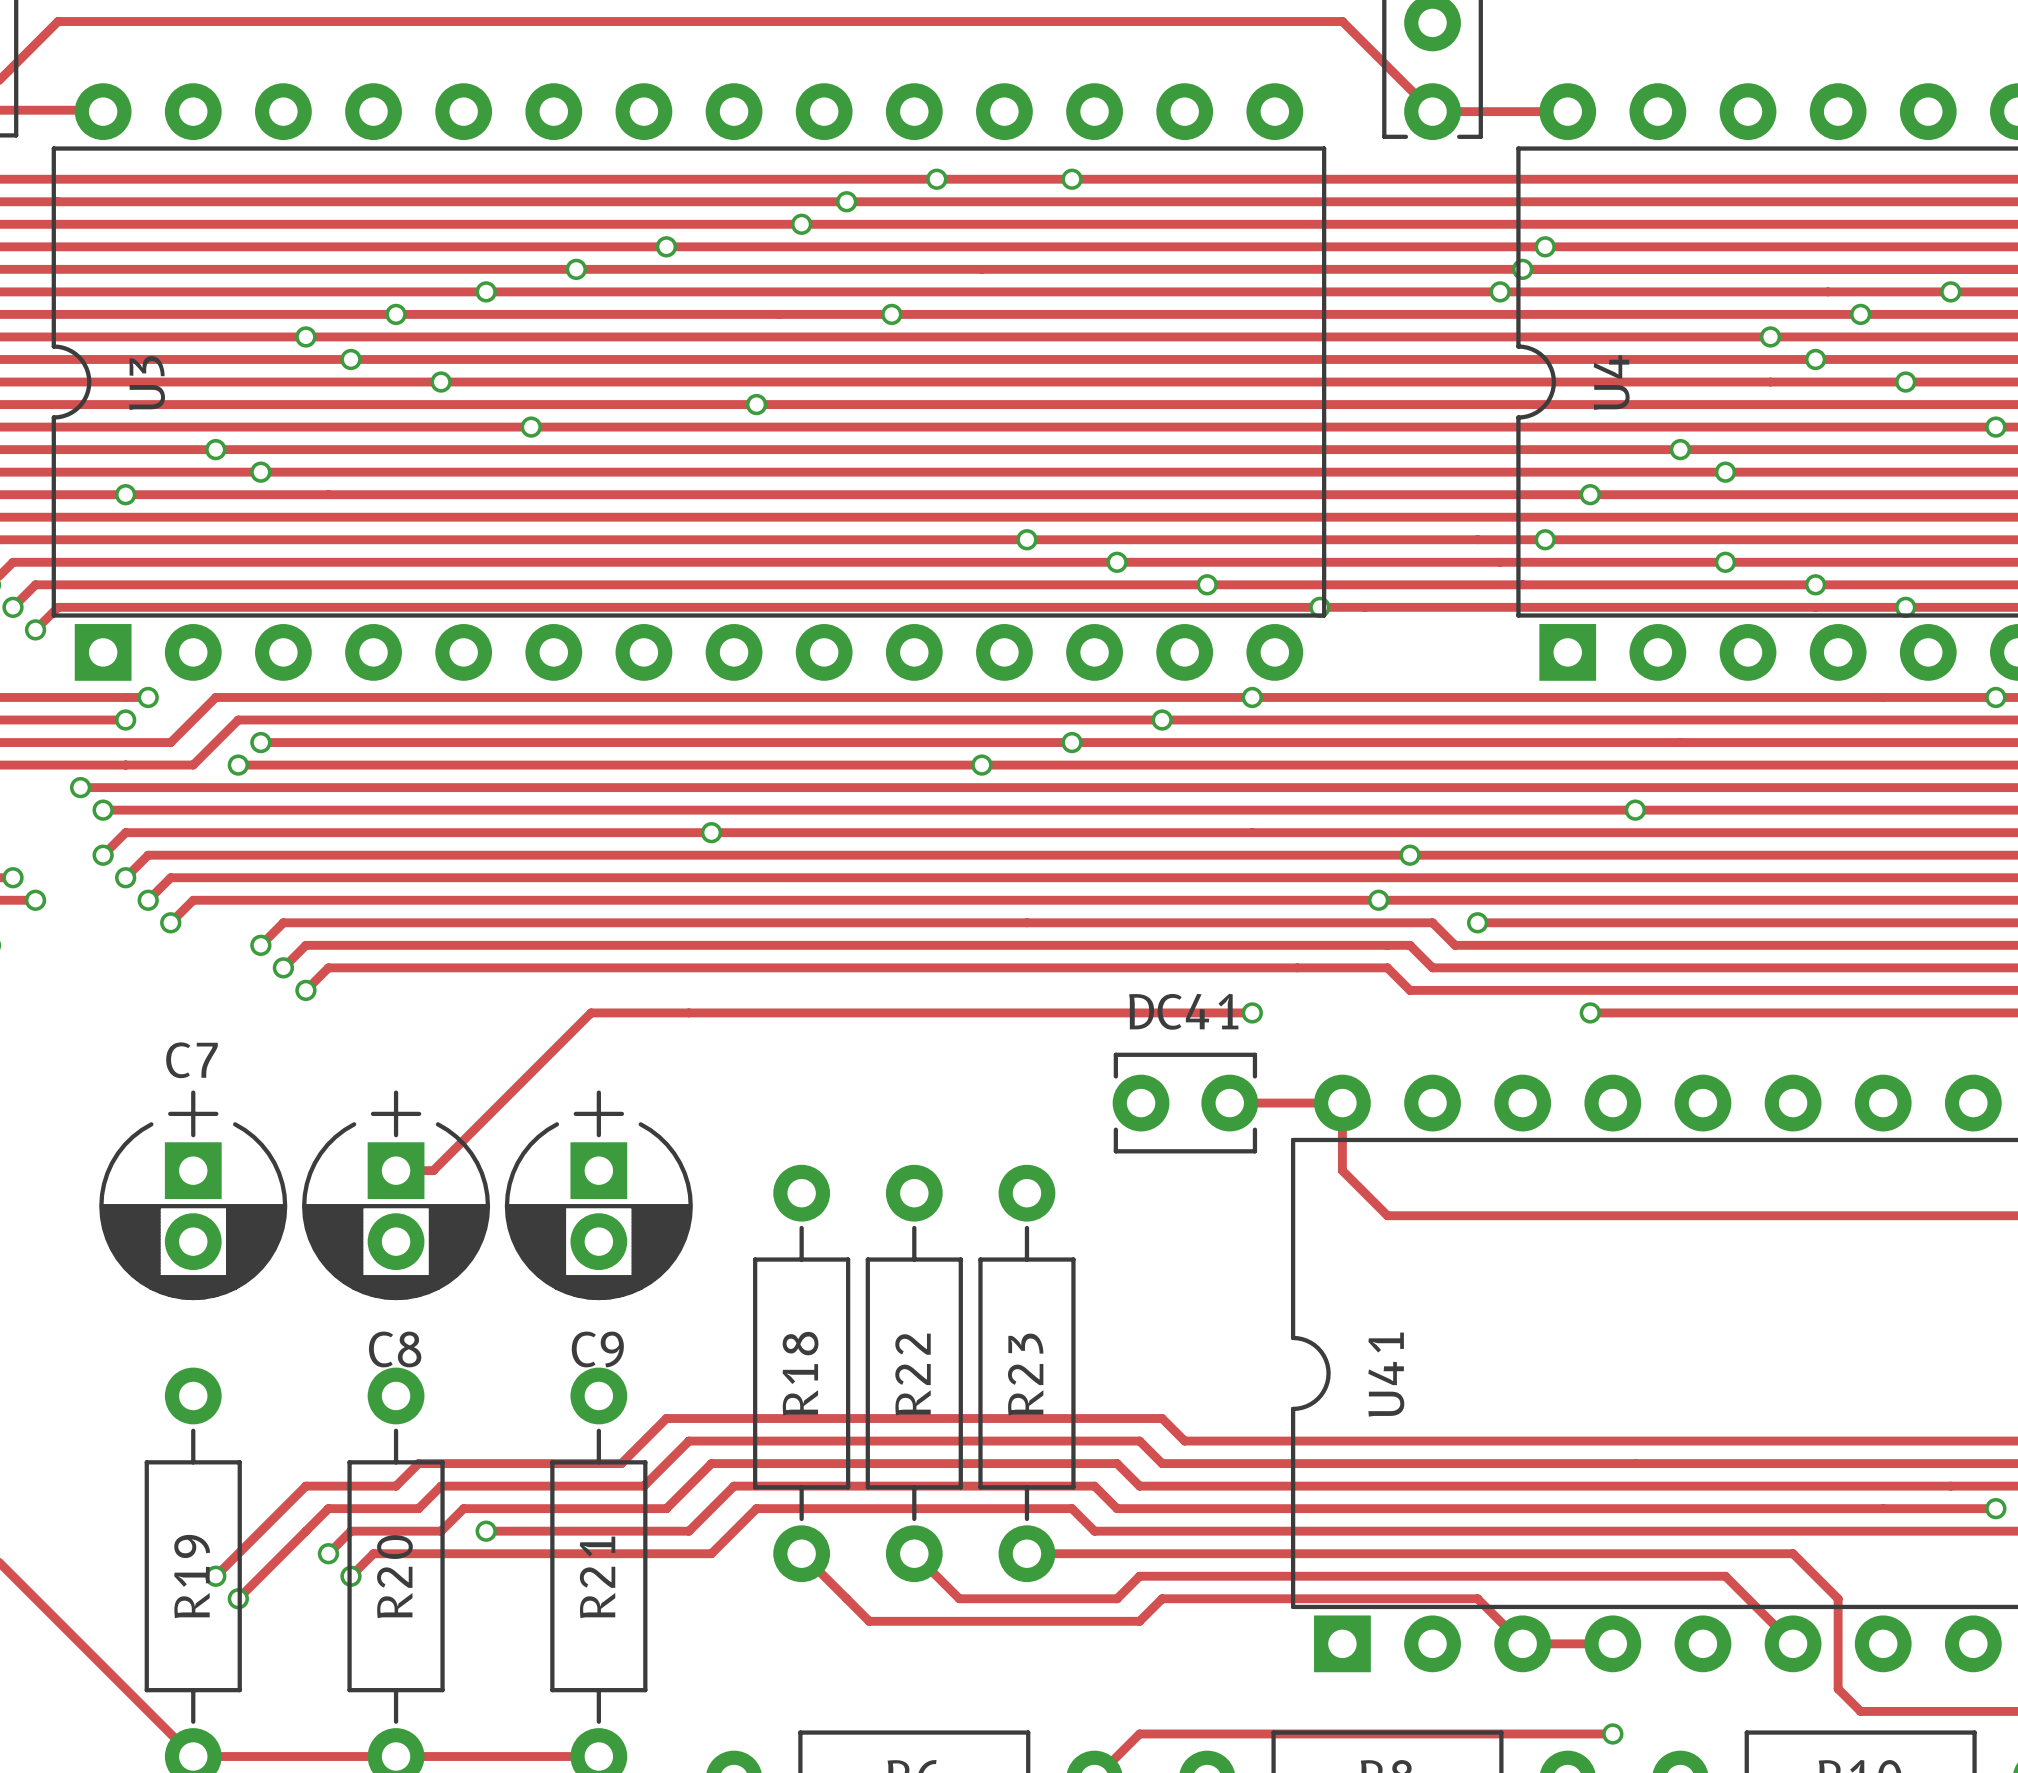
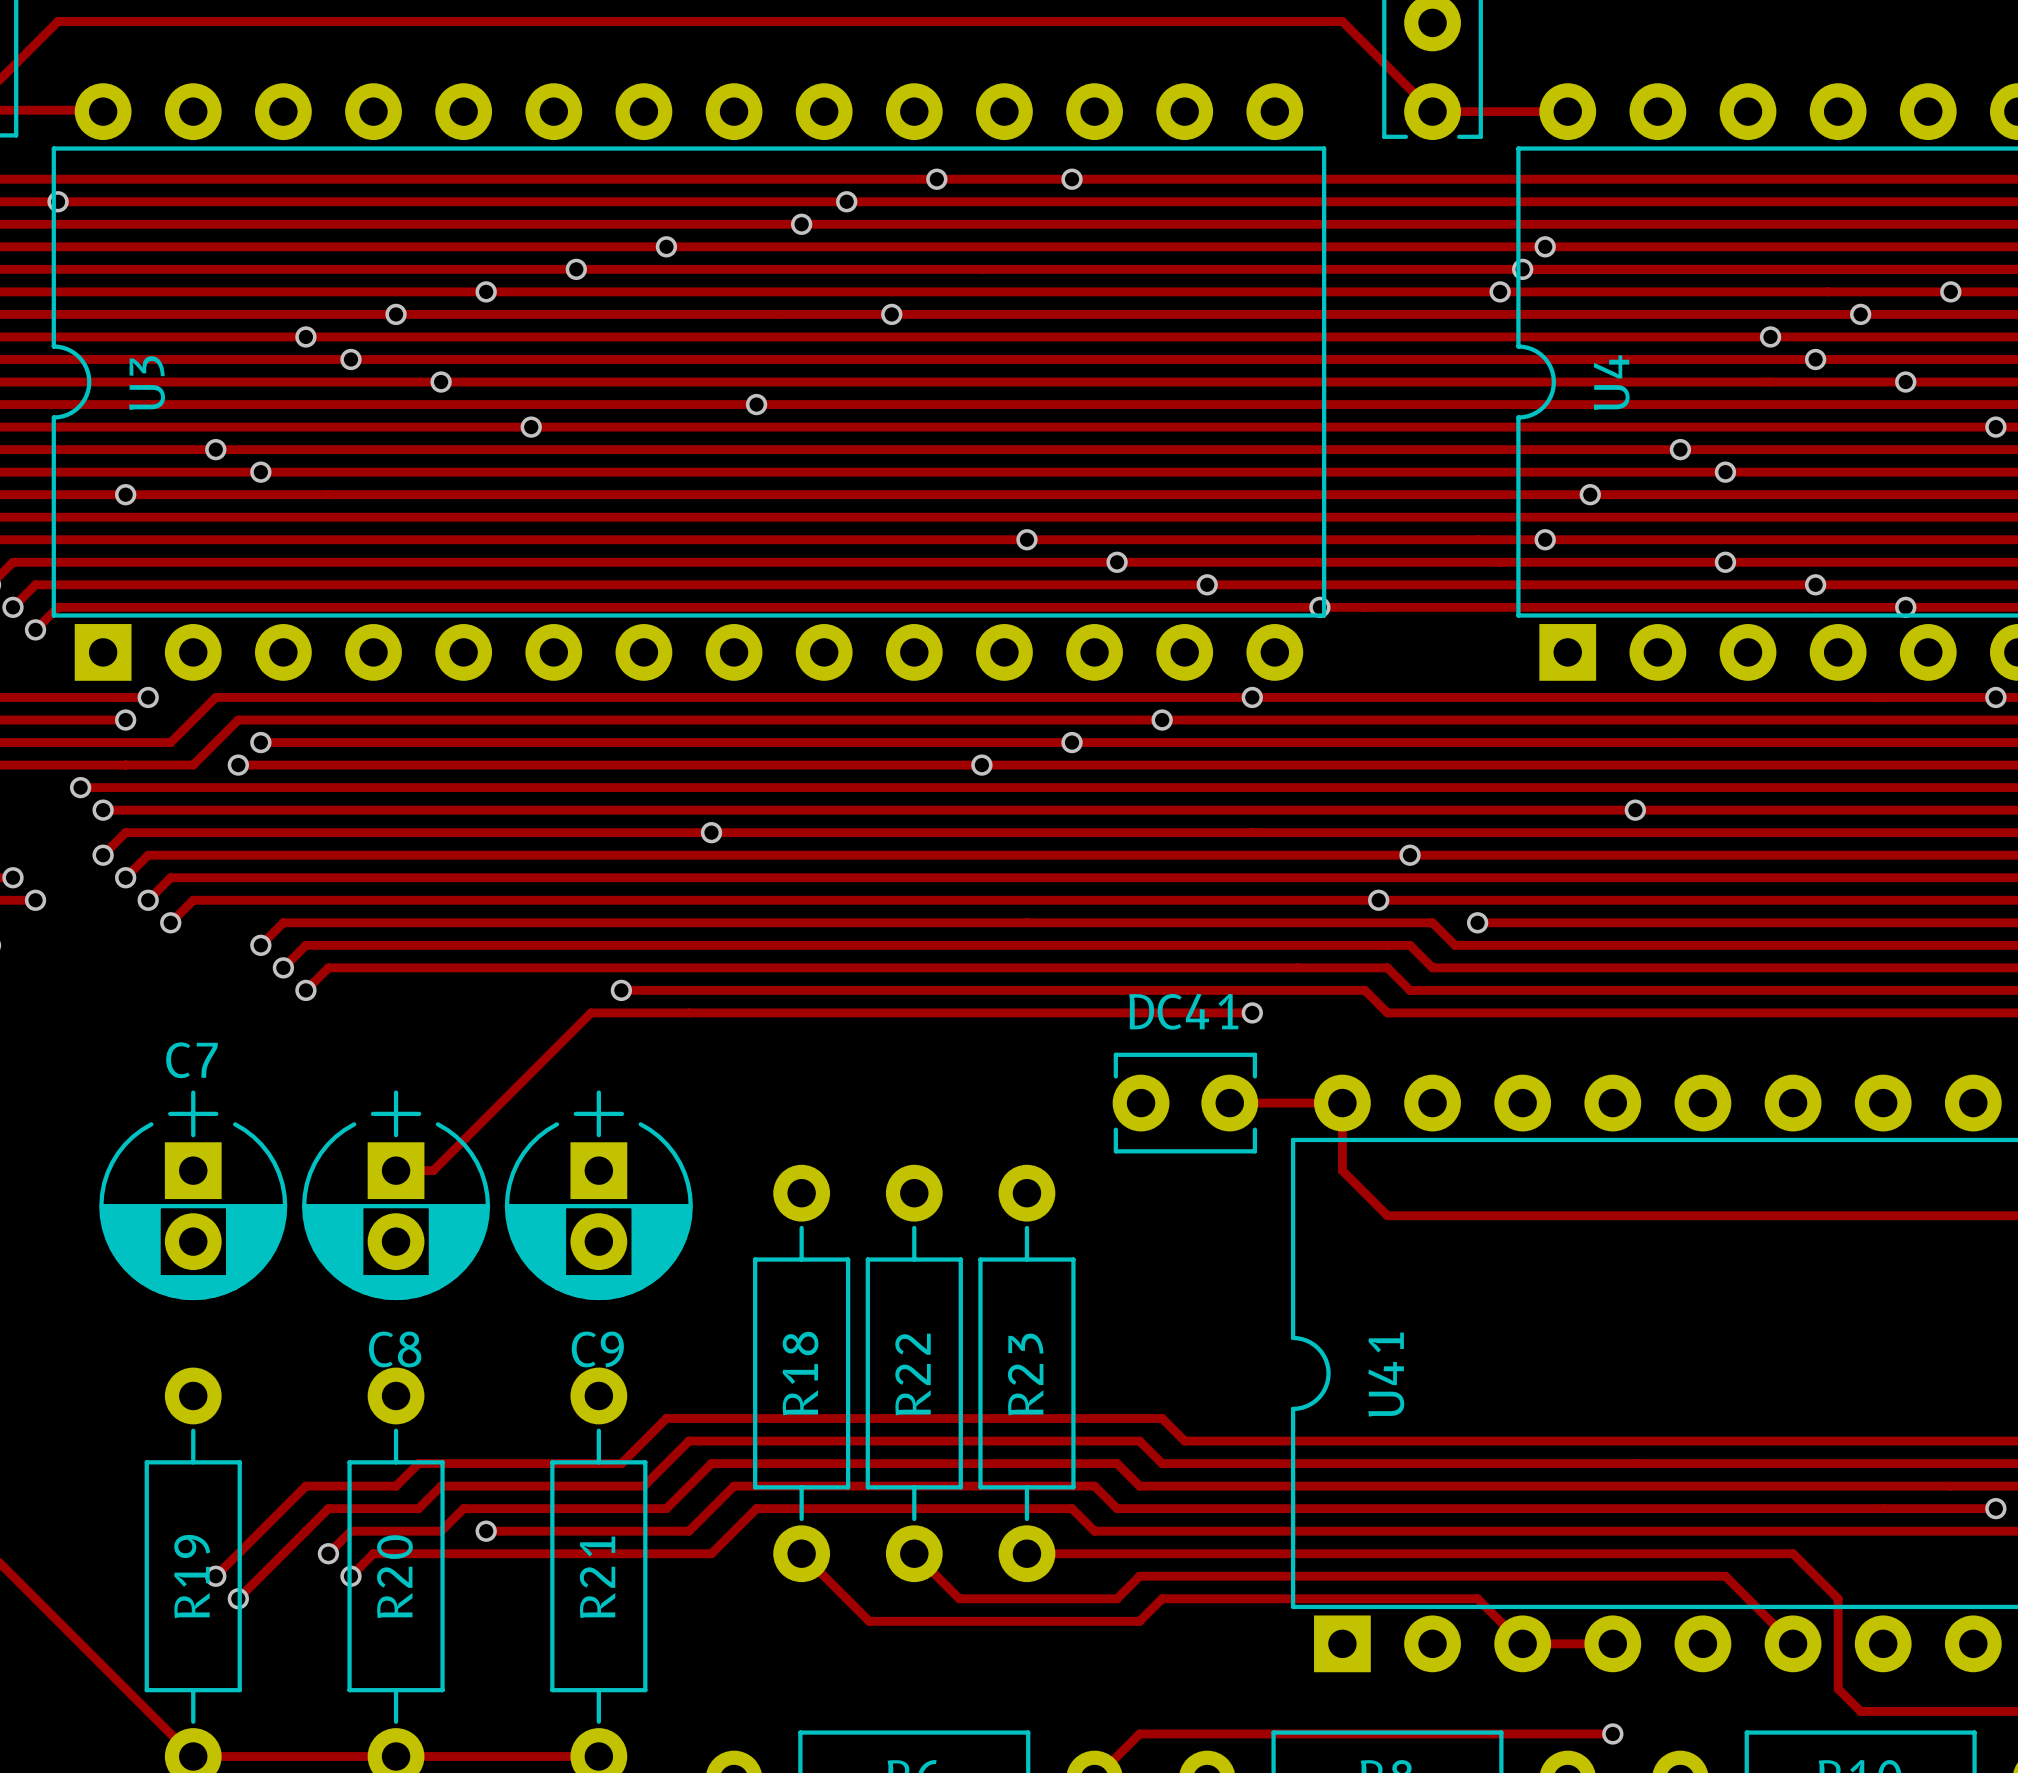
via: none -> (58, 201)
track: none -> (621, 990) (1364, 990) (1387, 1012) (1590, 1012)
via: none -> (621, 990)
via: (1590, 1012) -> none

